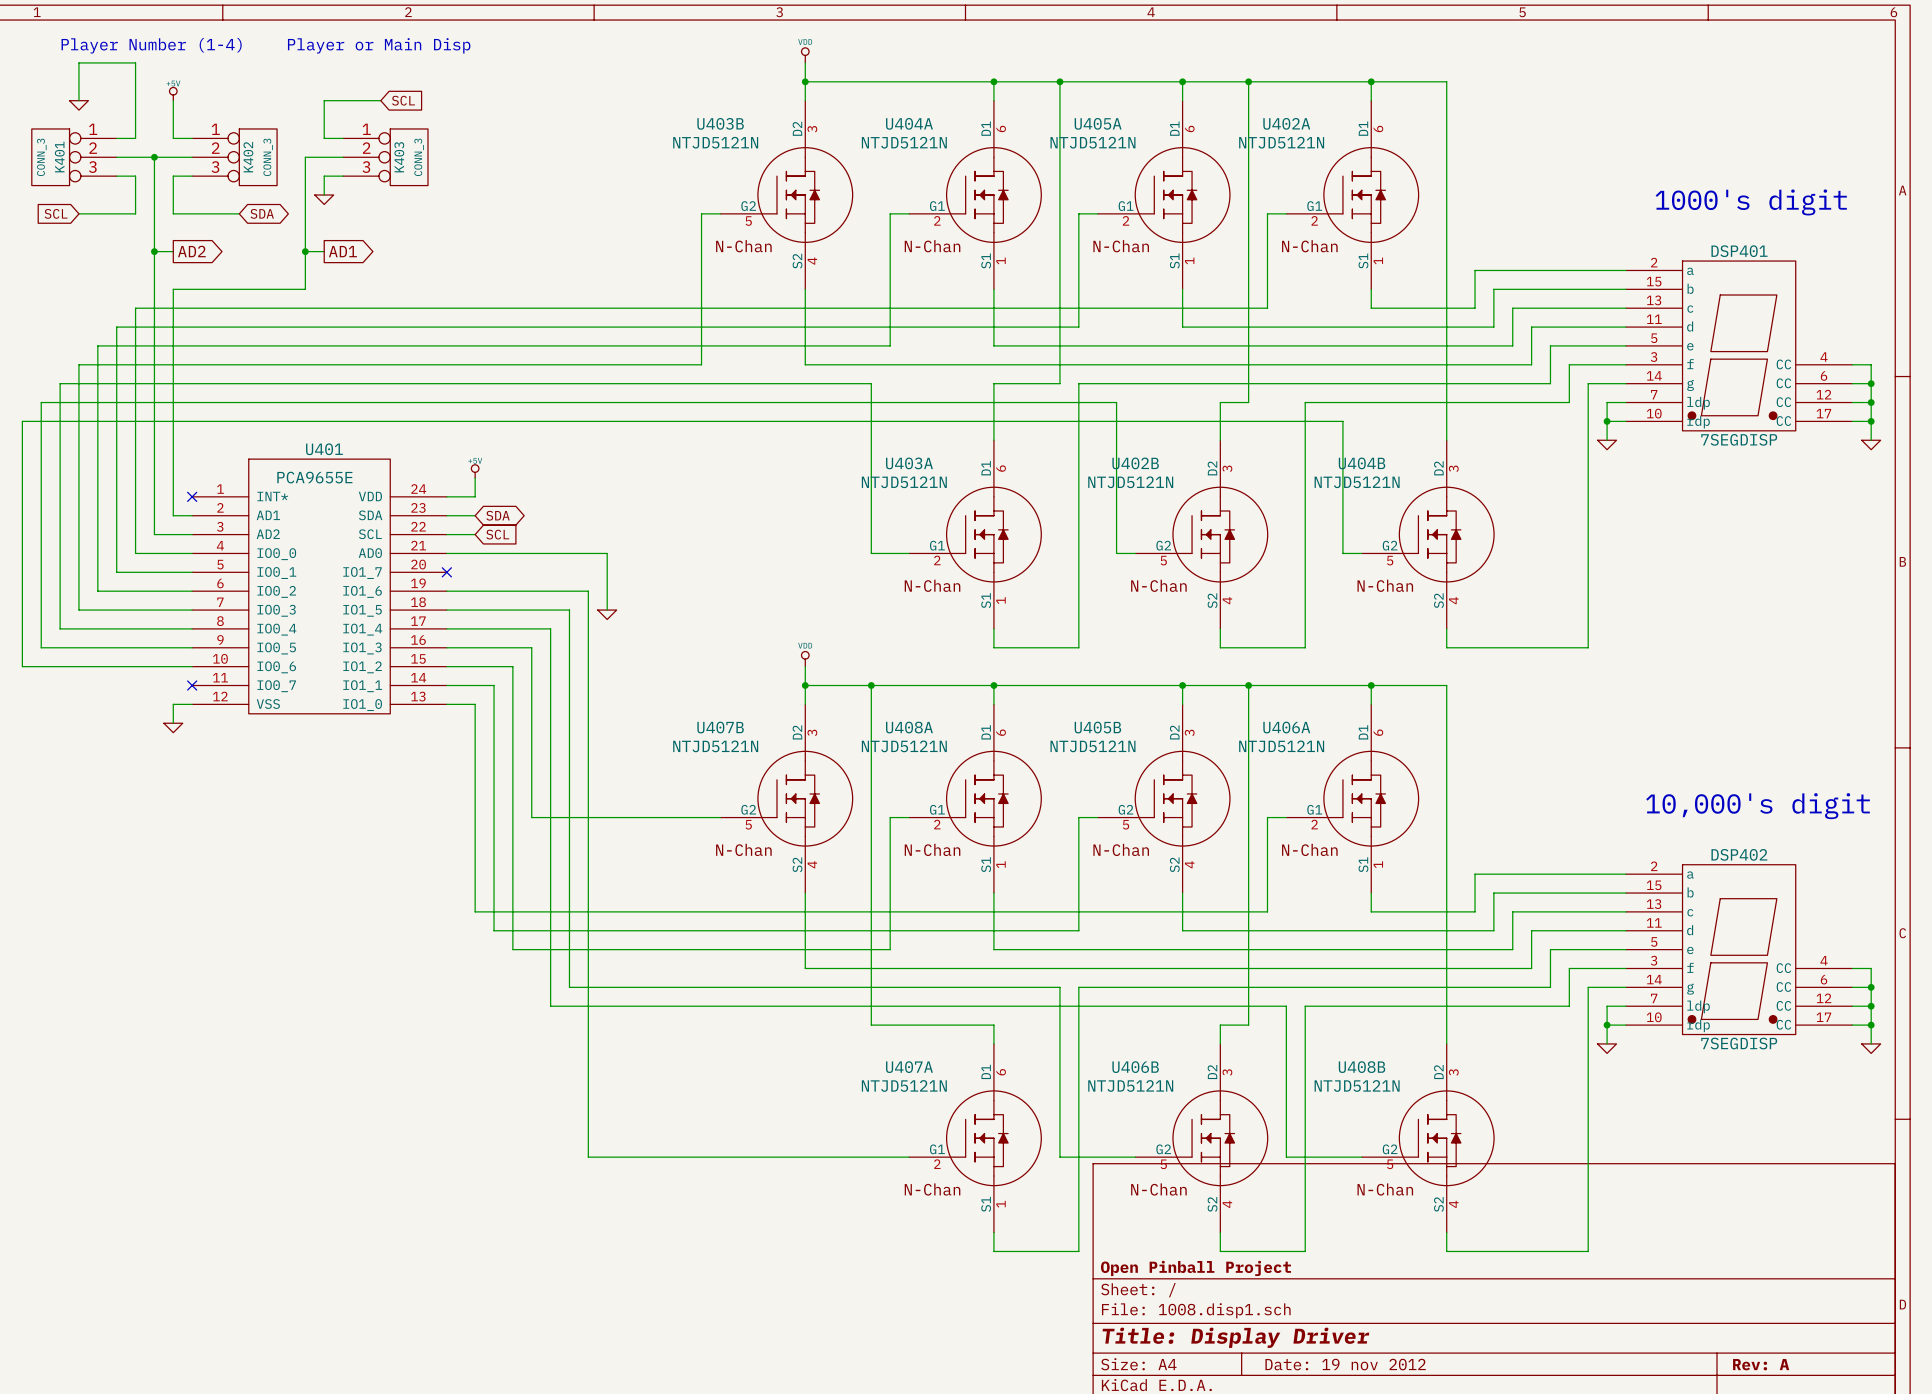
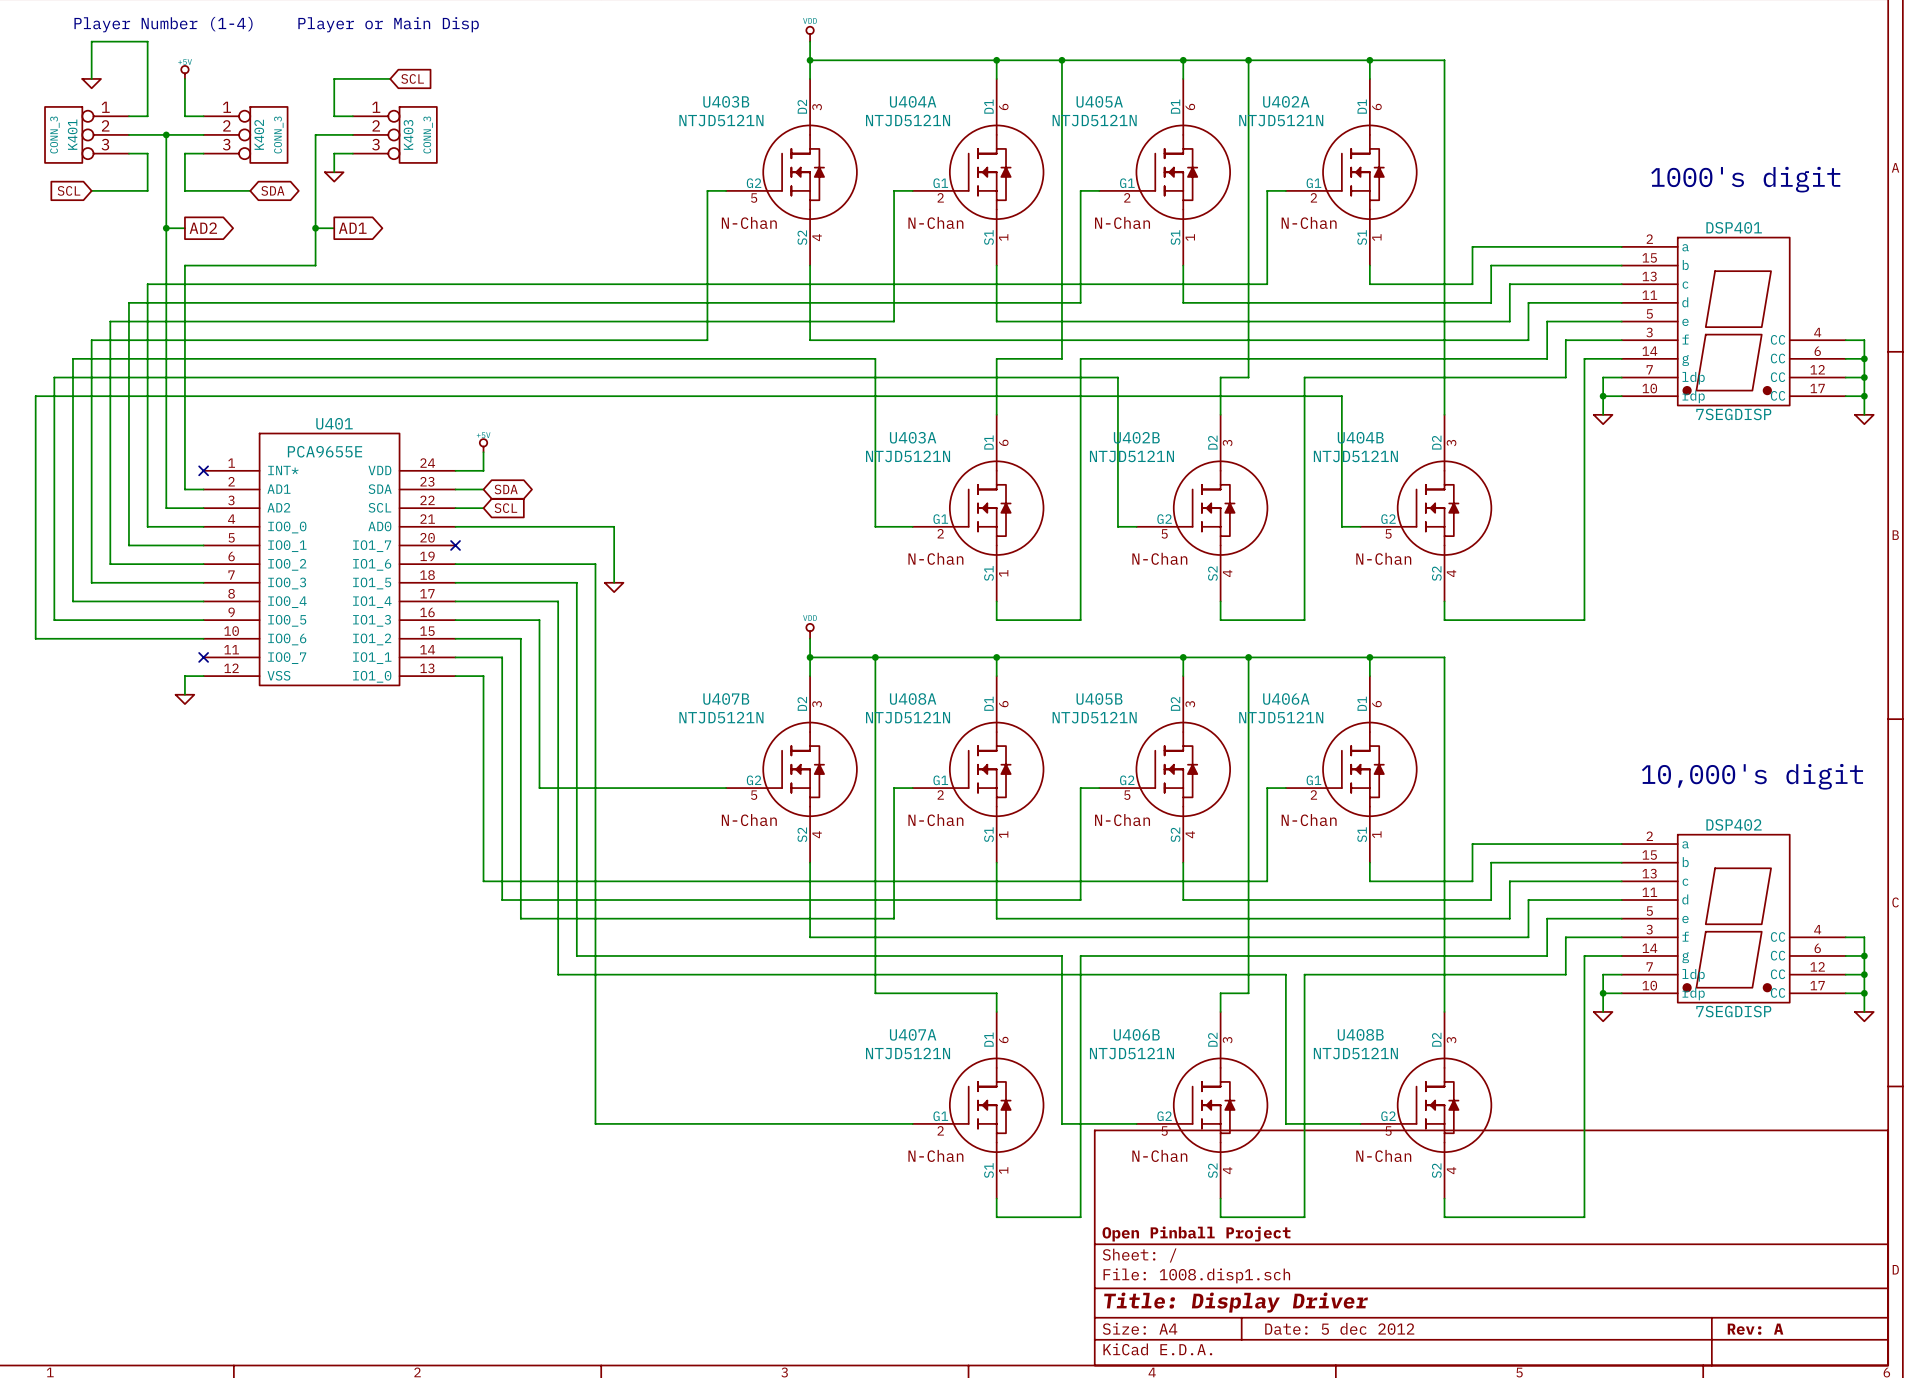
title block: Date: 19 nov 2012 (1345, 1364) -> Date: 5 dec 2012 (1339, 1328)

